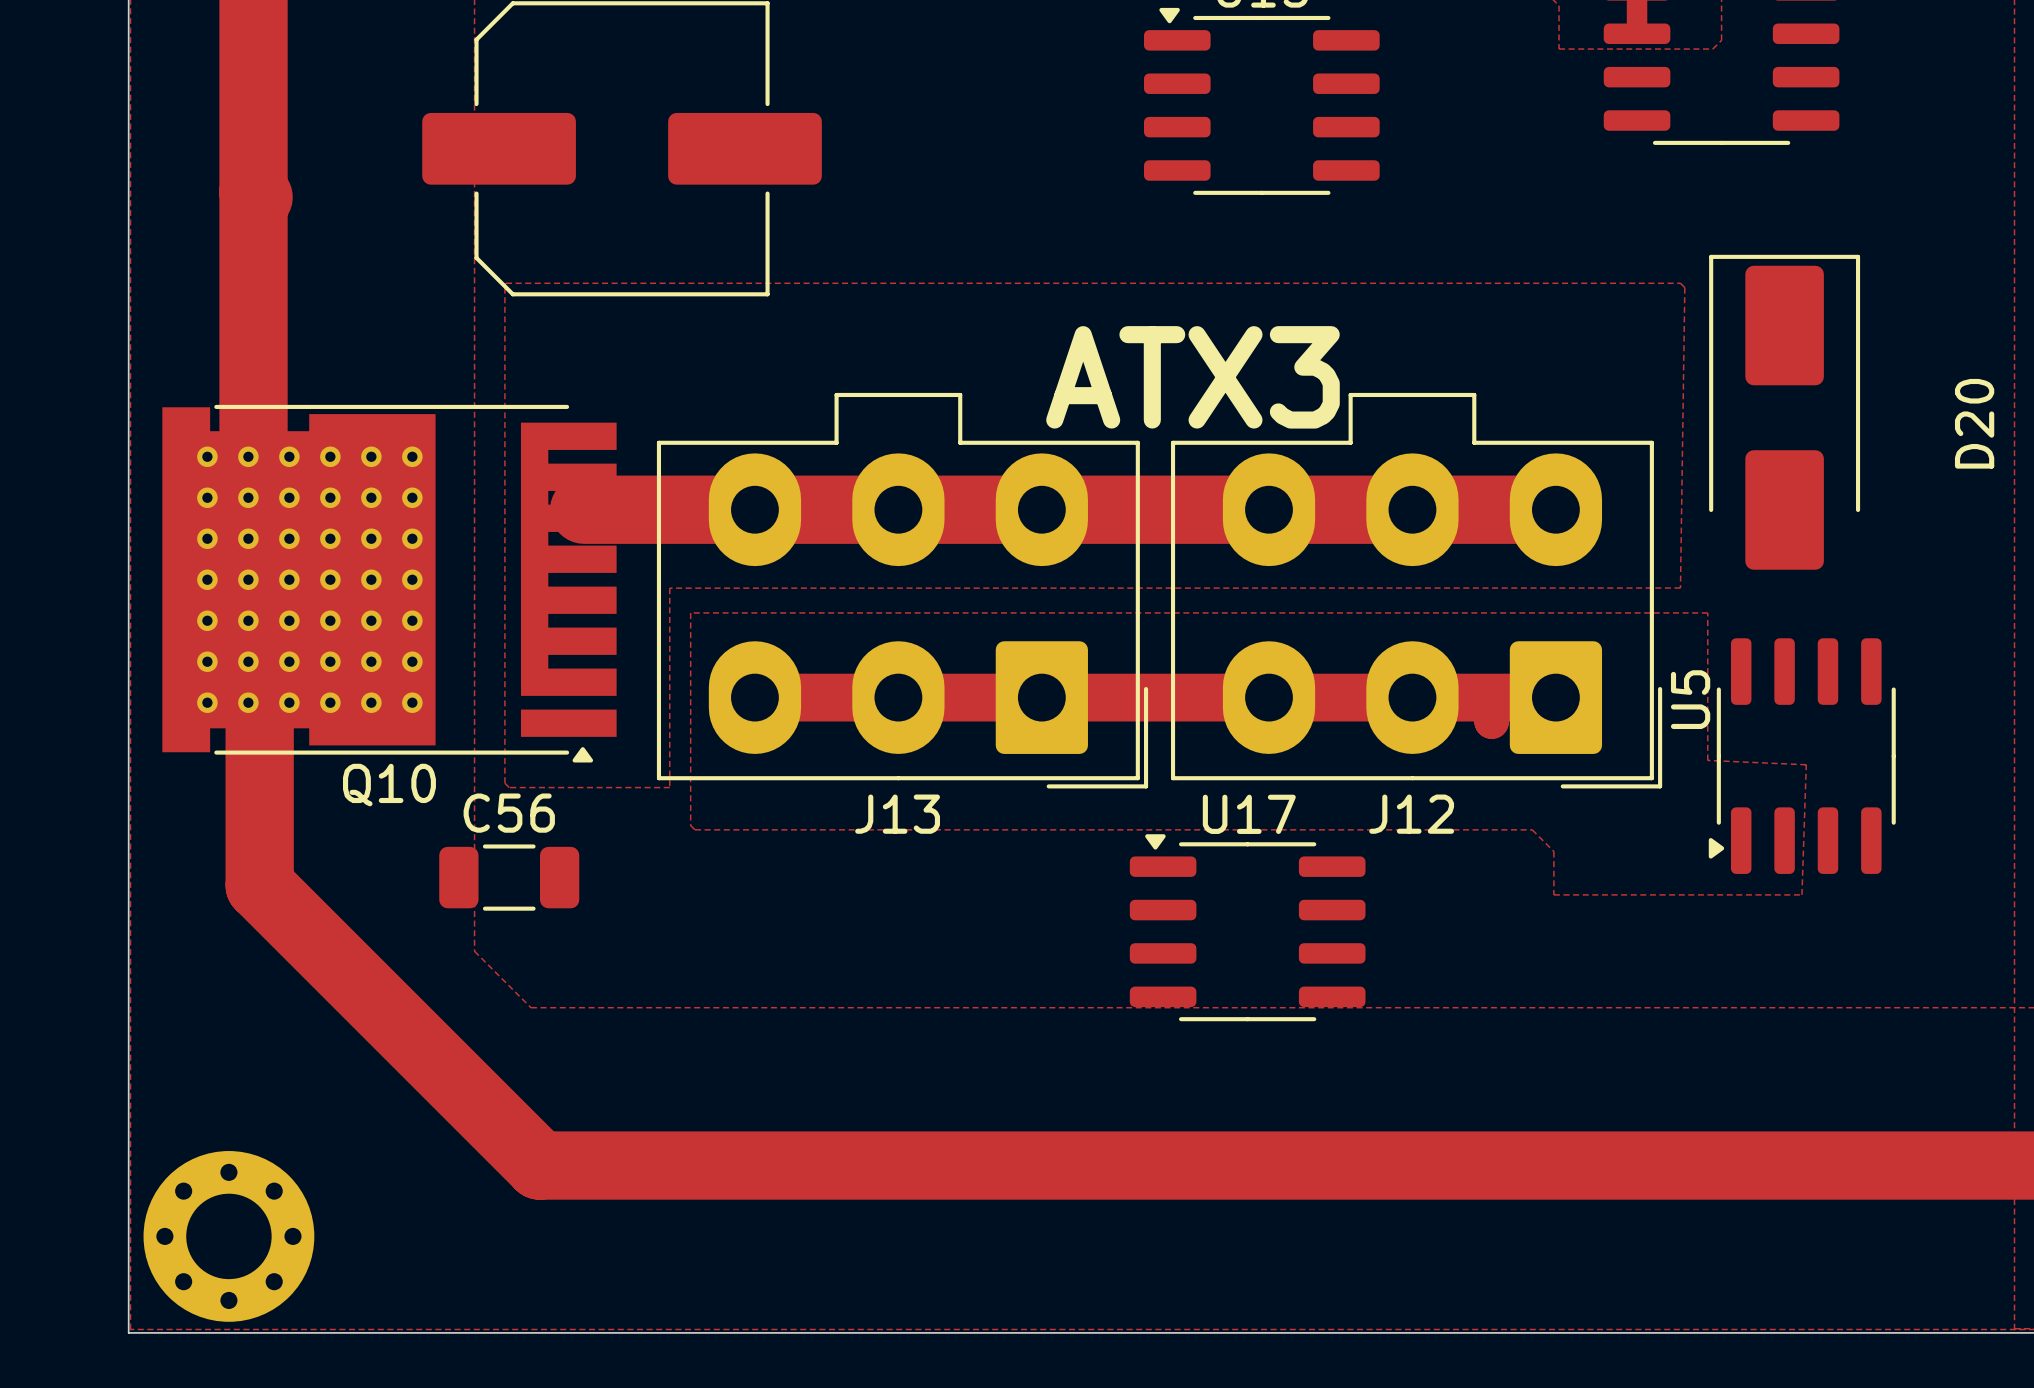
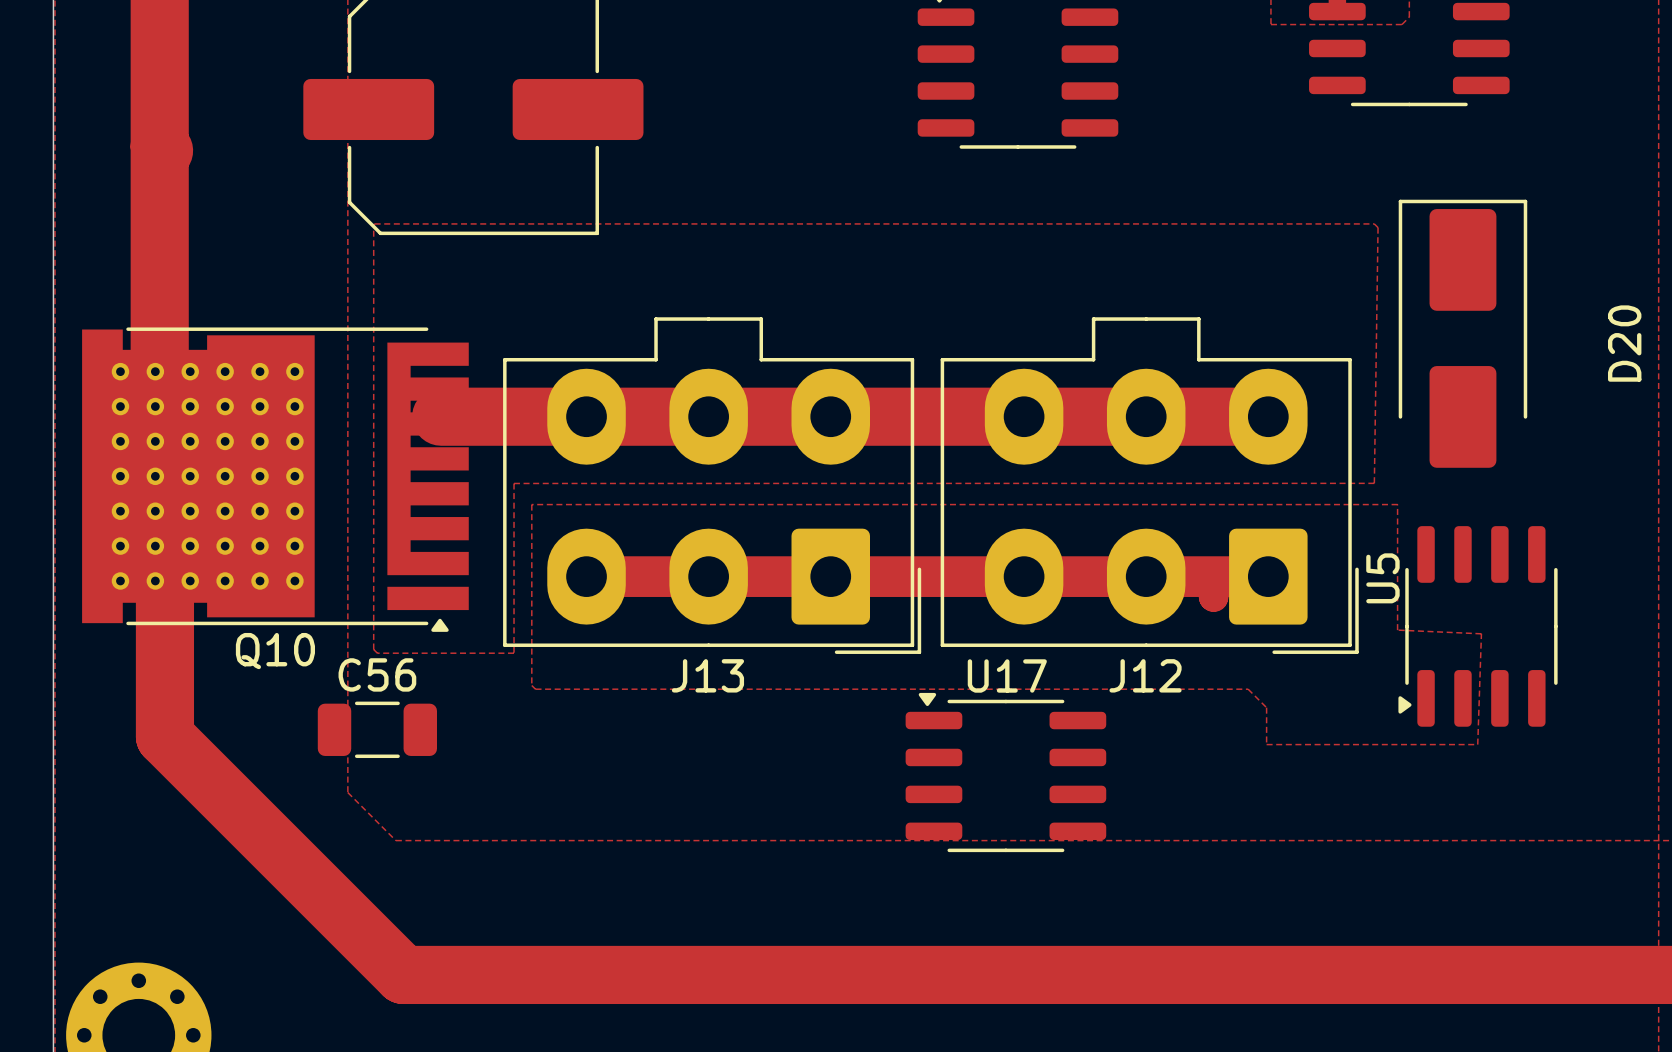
text: ATX3 (1192, 377) -> none

